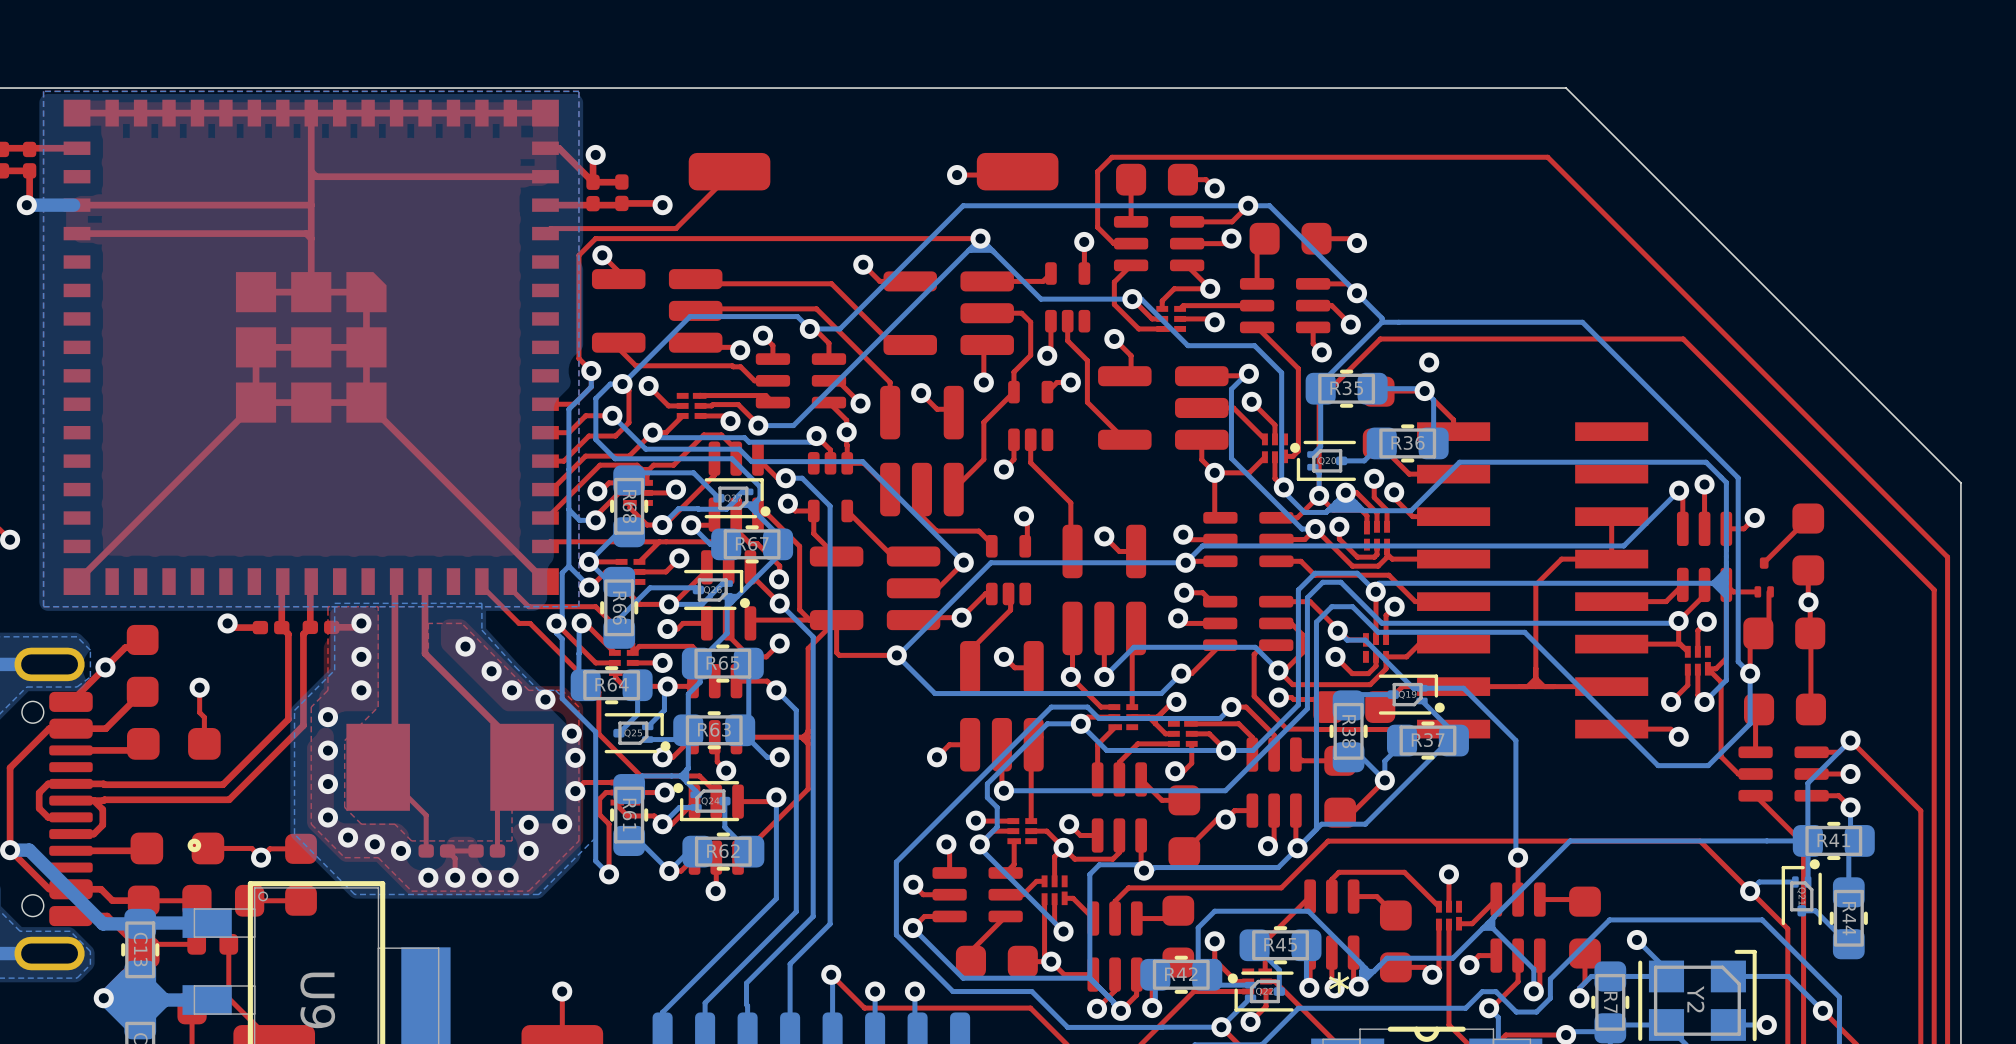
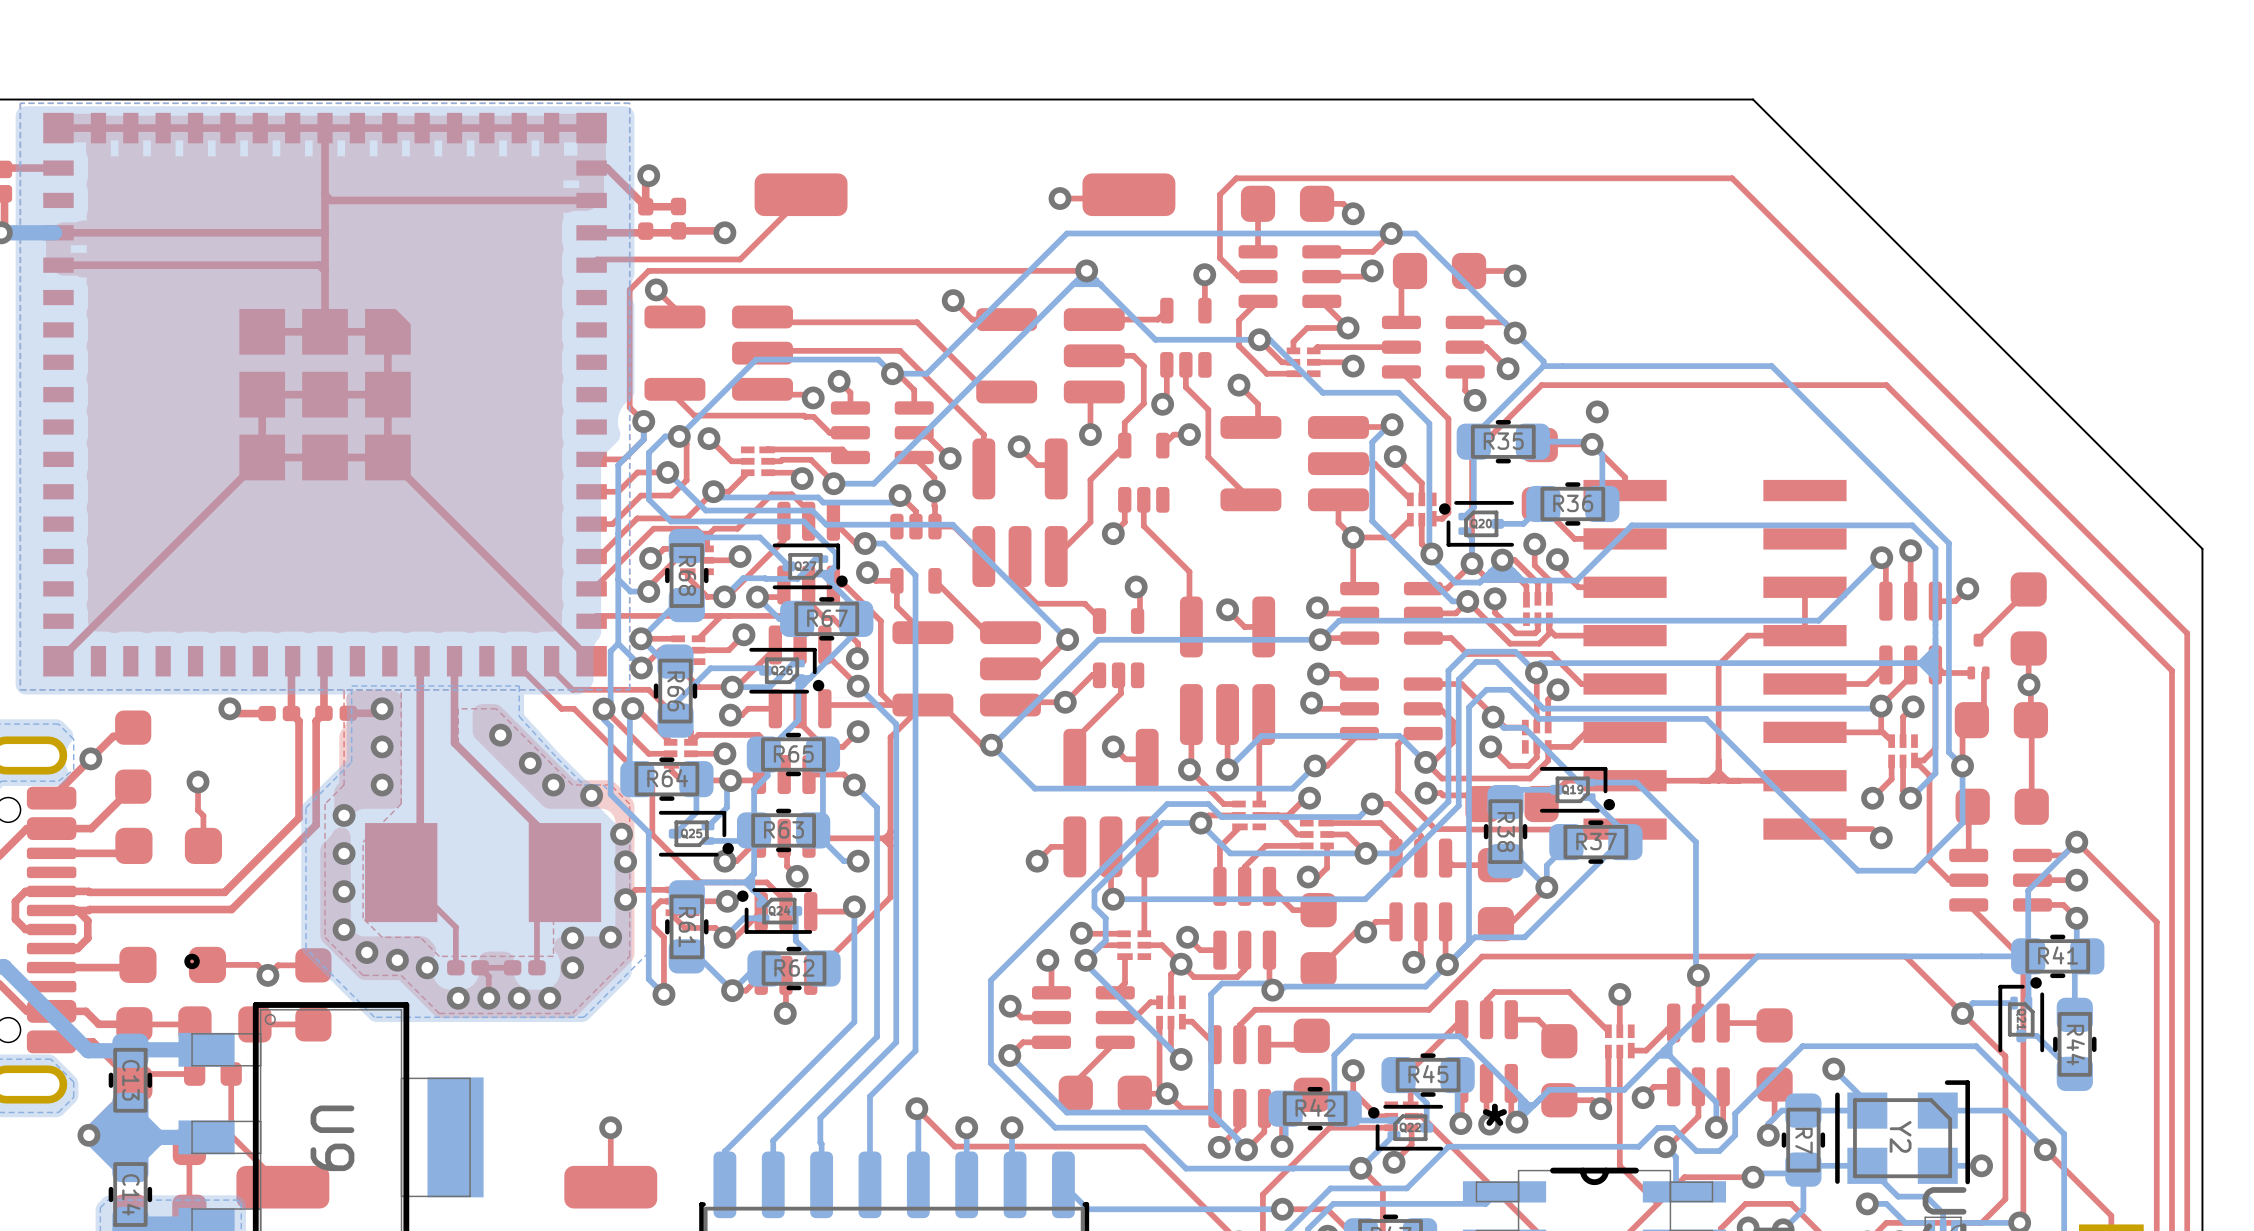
top track: (836, 620) (836, 652) (839, 655) (888, 655) -> (922, 705) (941, 705) (982, 745)

